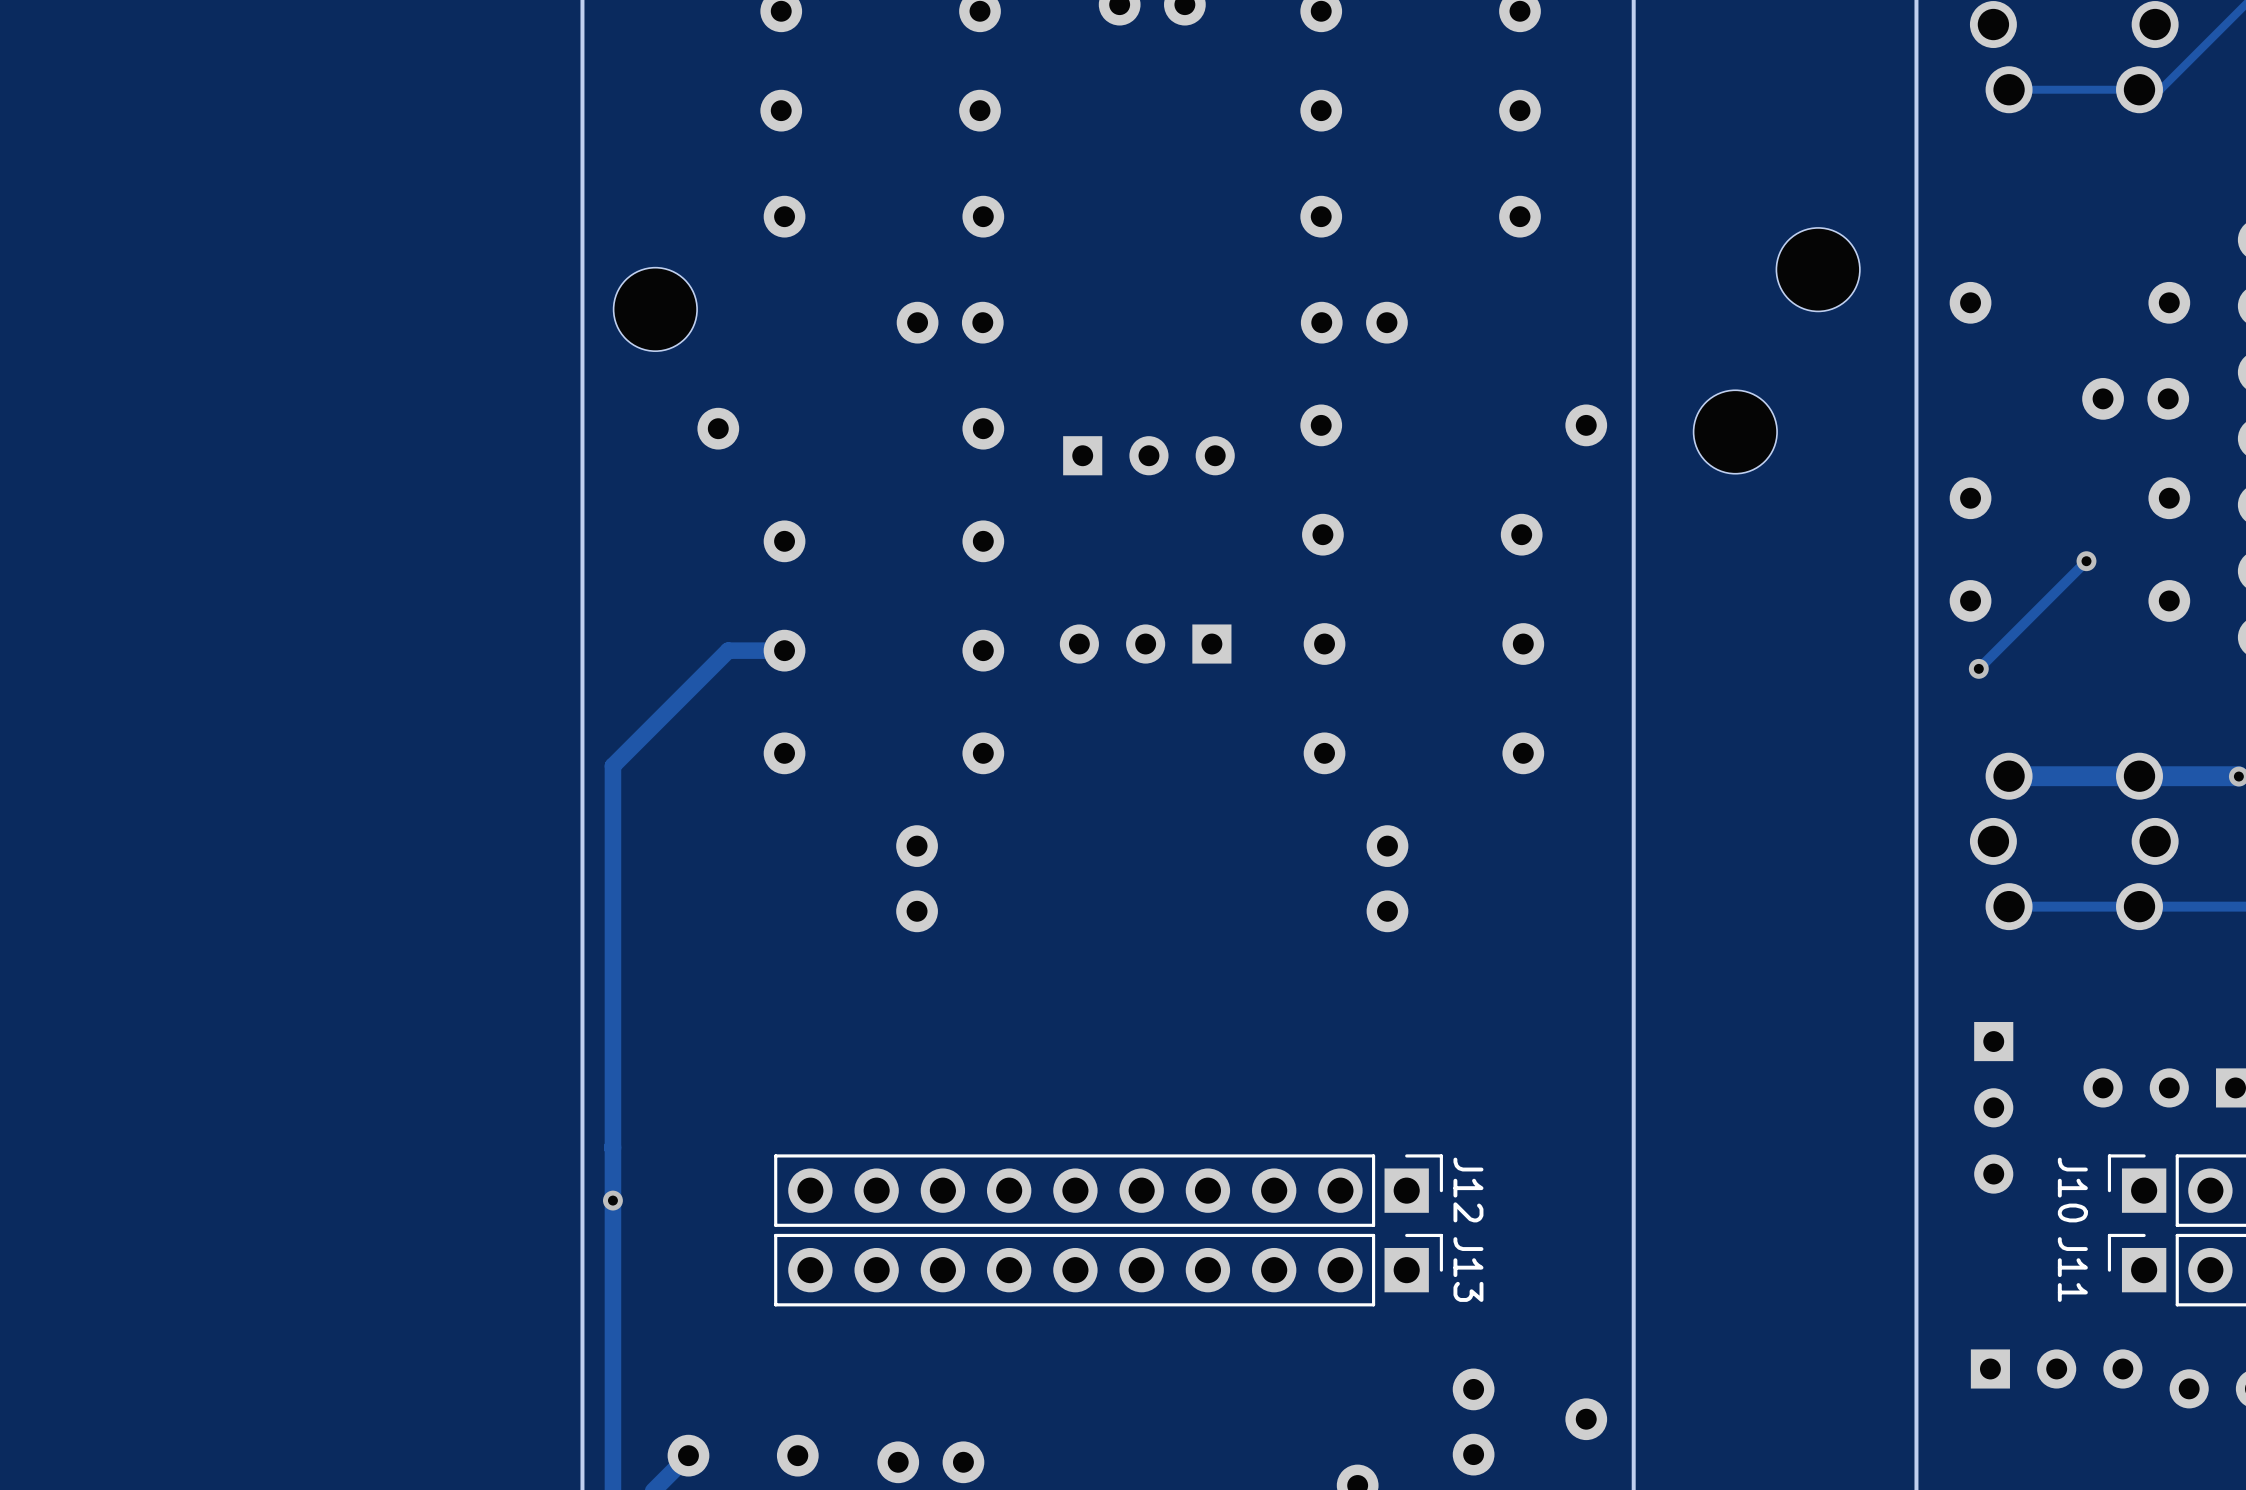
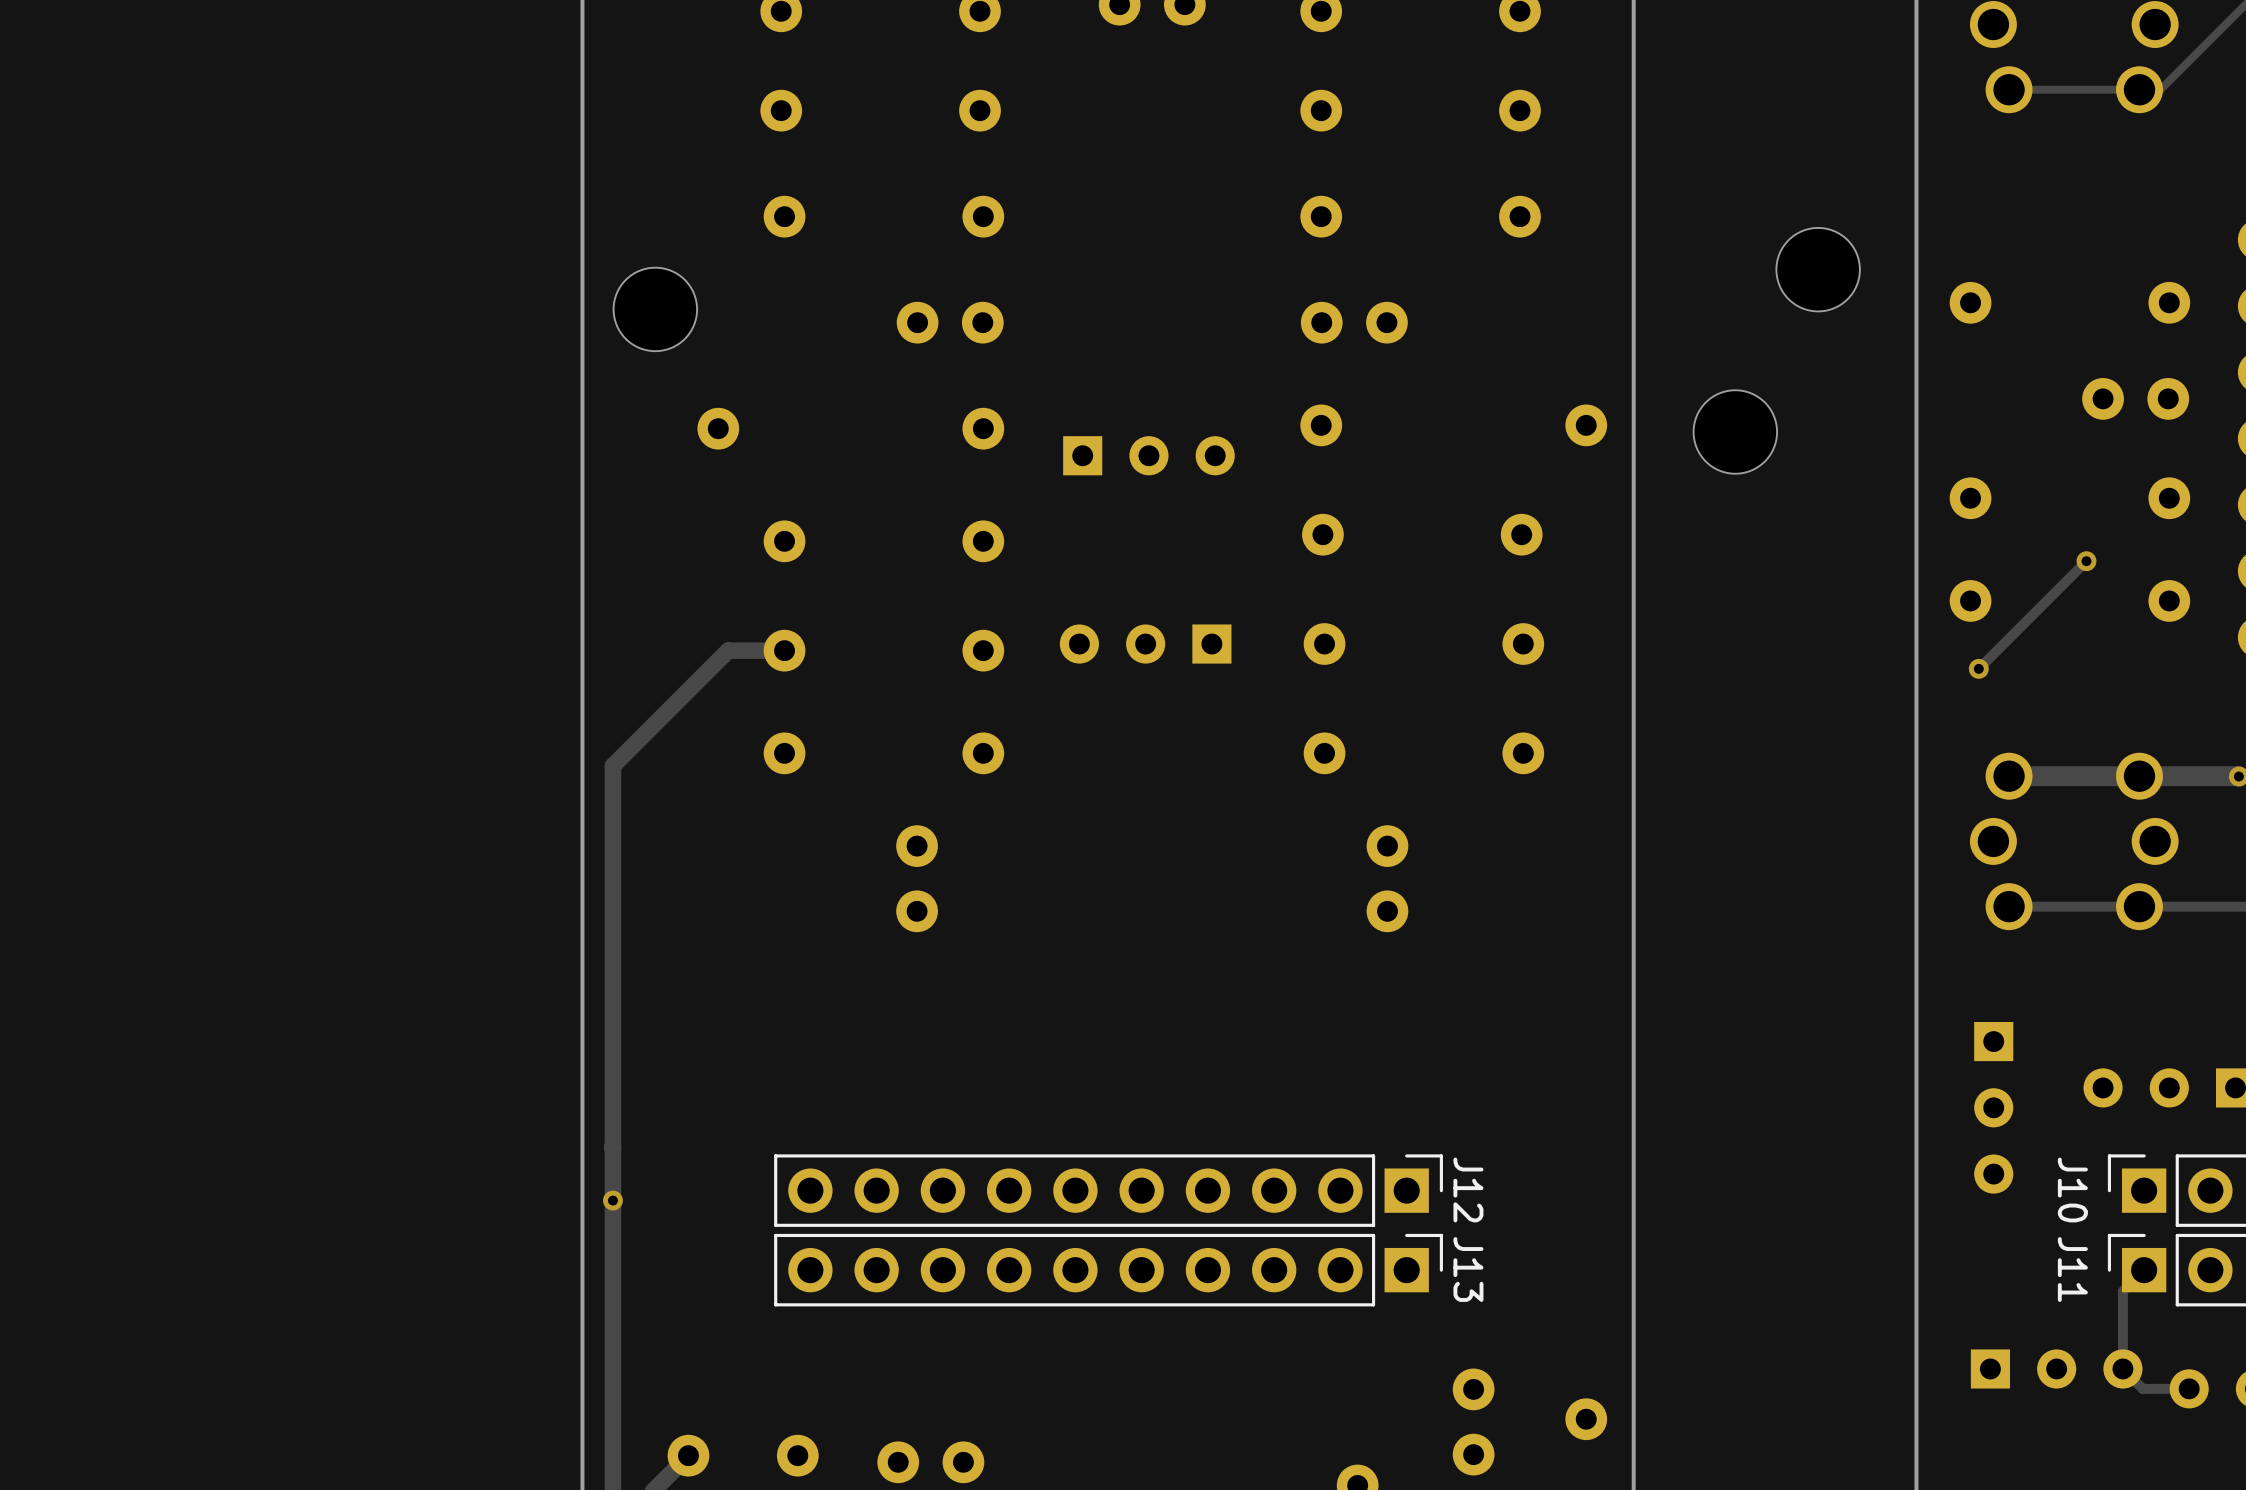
track: none -> (2144, 1270) (2122, 1291) (2122, 1368) (2142, 1388) (2189, 1388)

